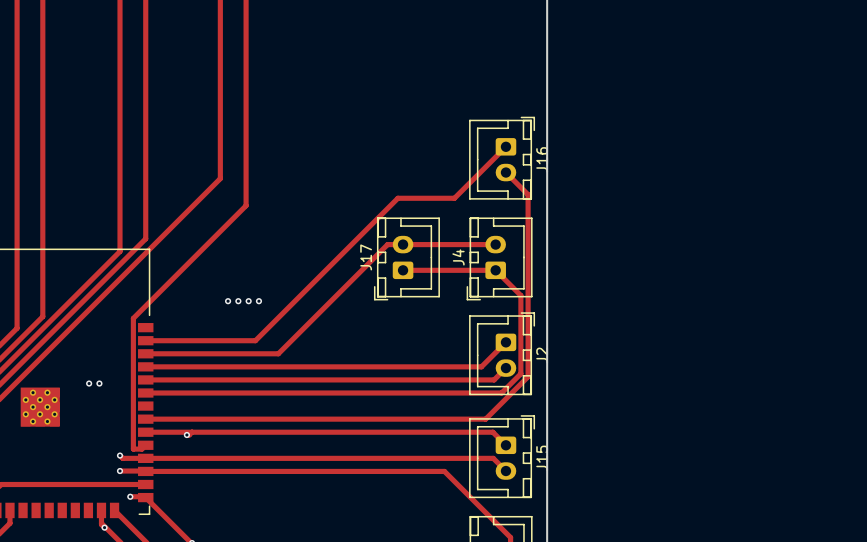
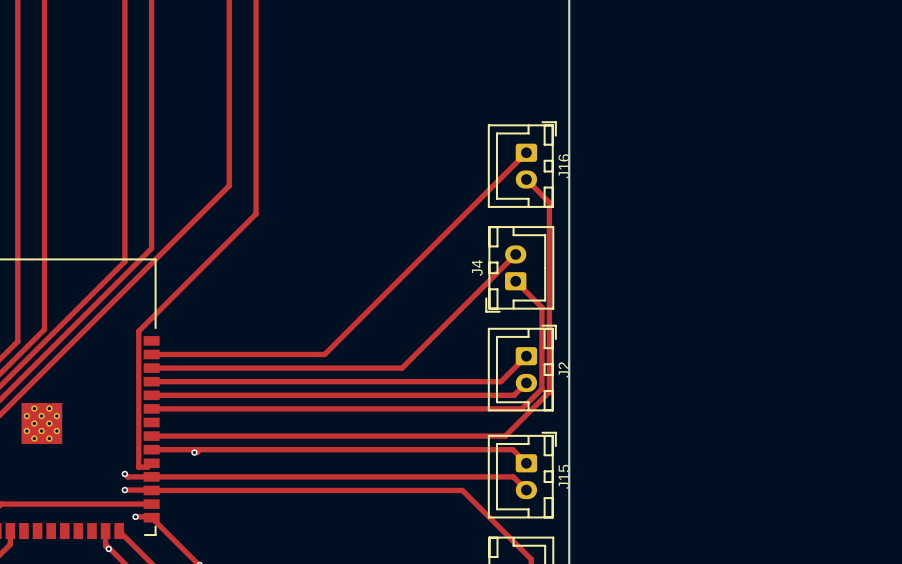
track: (454, 198) (397, 198) (255, 340) -> (472, 206) (324, 354) (265, 354)
track: (495, 244) (387, 244) (278, 353) -> (515, 254) (402, 368) (289, 368)
J17: (406, 258) -> none
track: (403, 270) (495, 270) -> none
via: (228, 301) -> none
via: (238, 301) -> none
via: (248, 301) -> none
via: (258, 301) -> none
via: (89, 383) -> none
via: (99, 383) -> none

